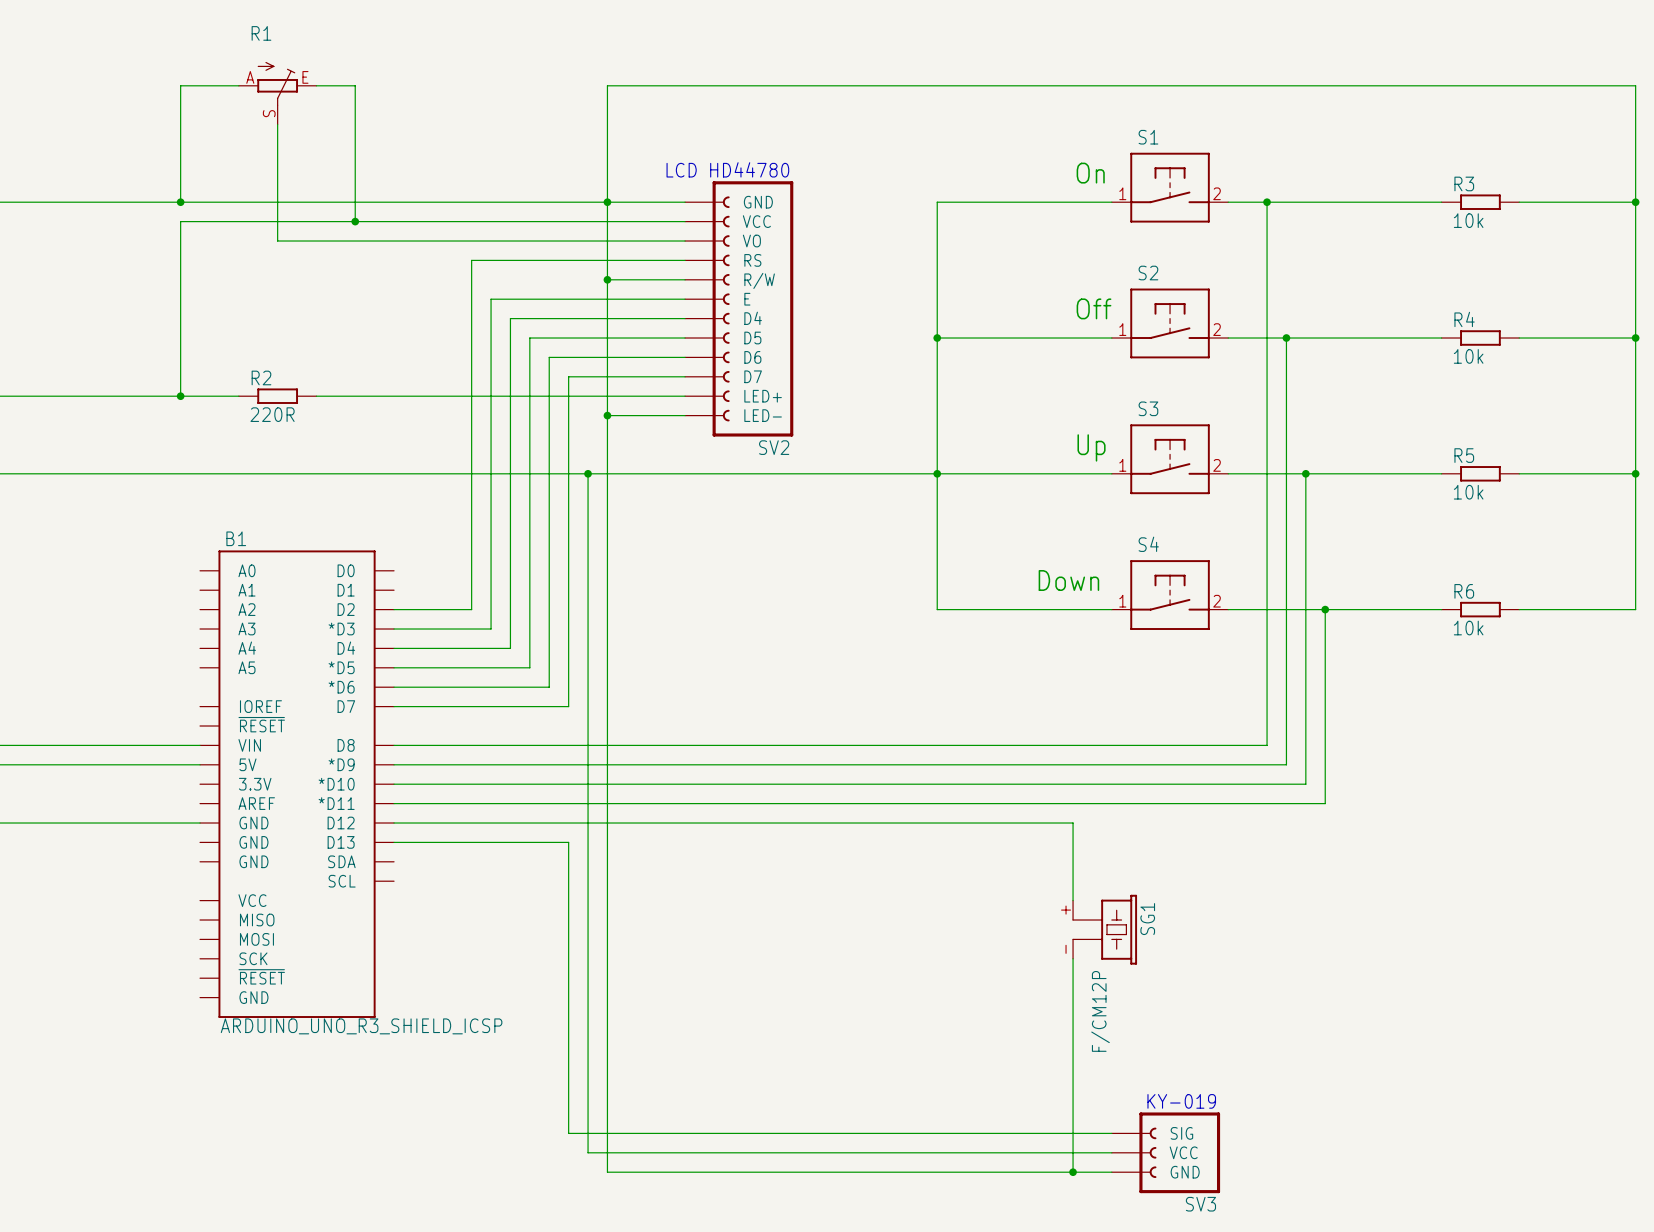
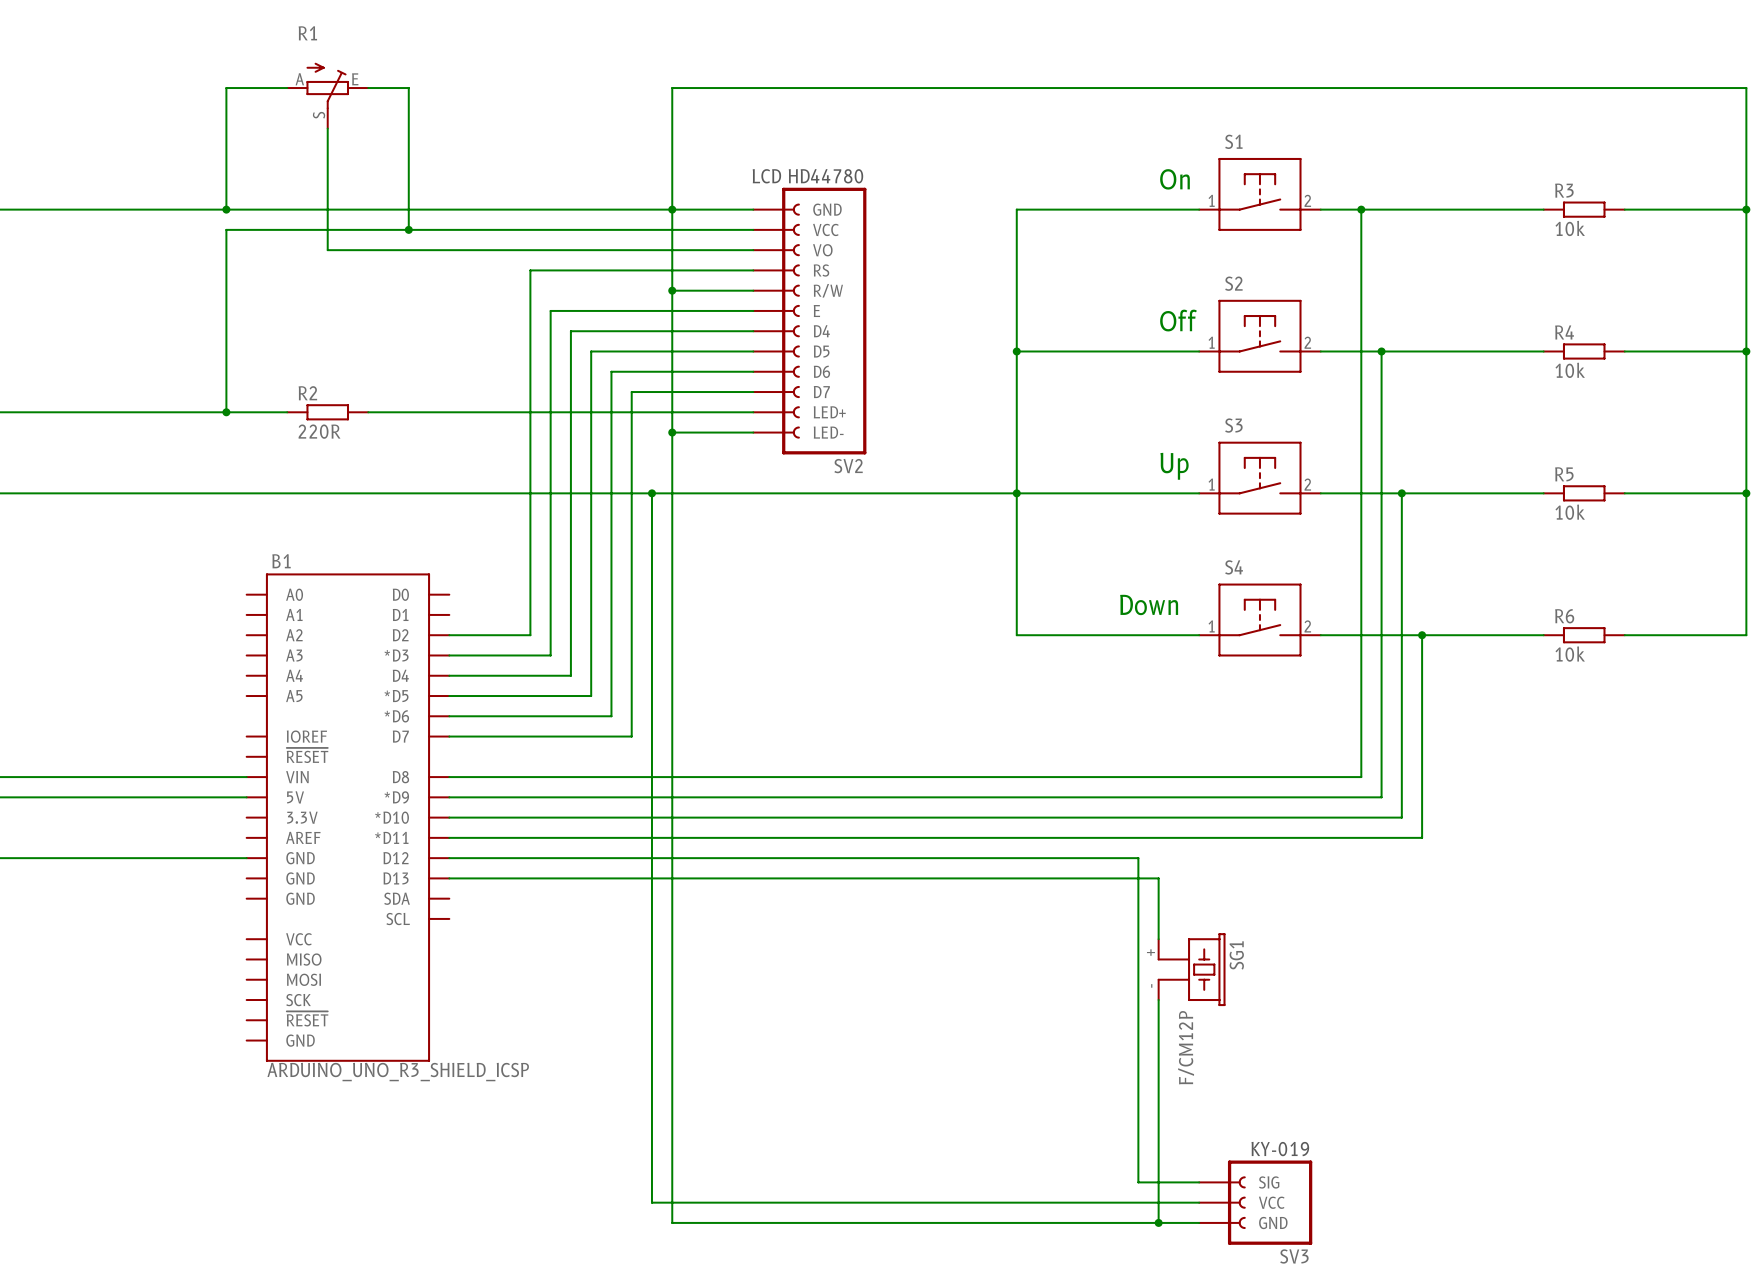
wire: (1053, 823) (1073, 823) (1073, 842) -> (1138, 858) (1138, 1182)
wire: (568, 842) (568, 1133) (1053, 1133) -> (631, 878) (1158, 878)

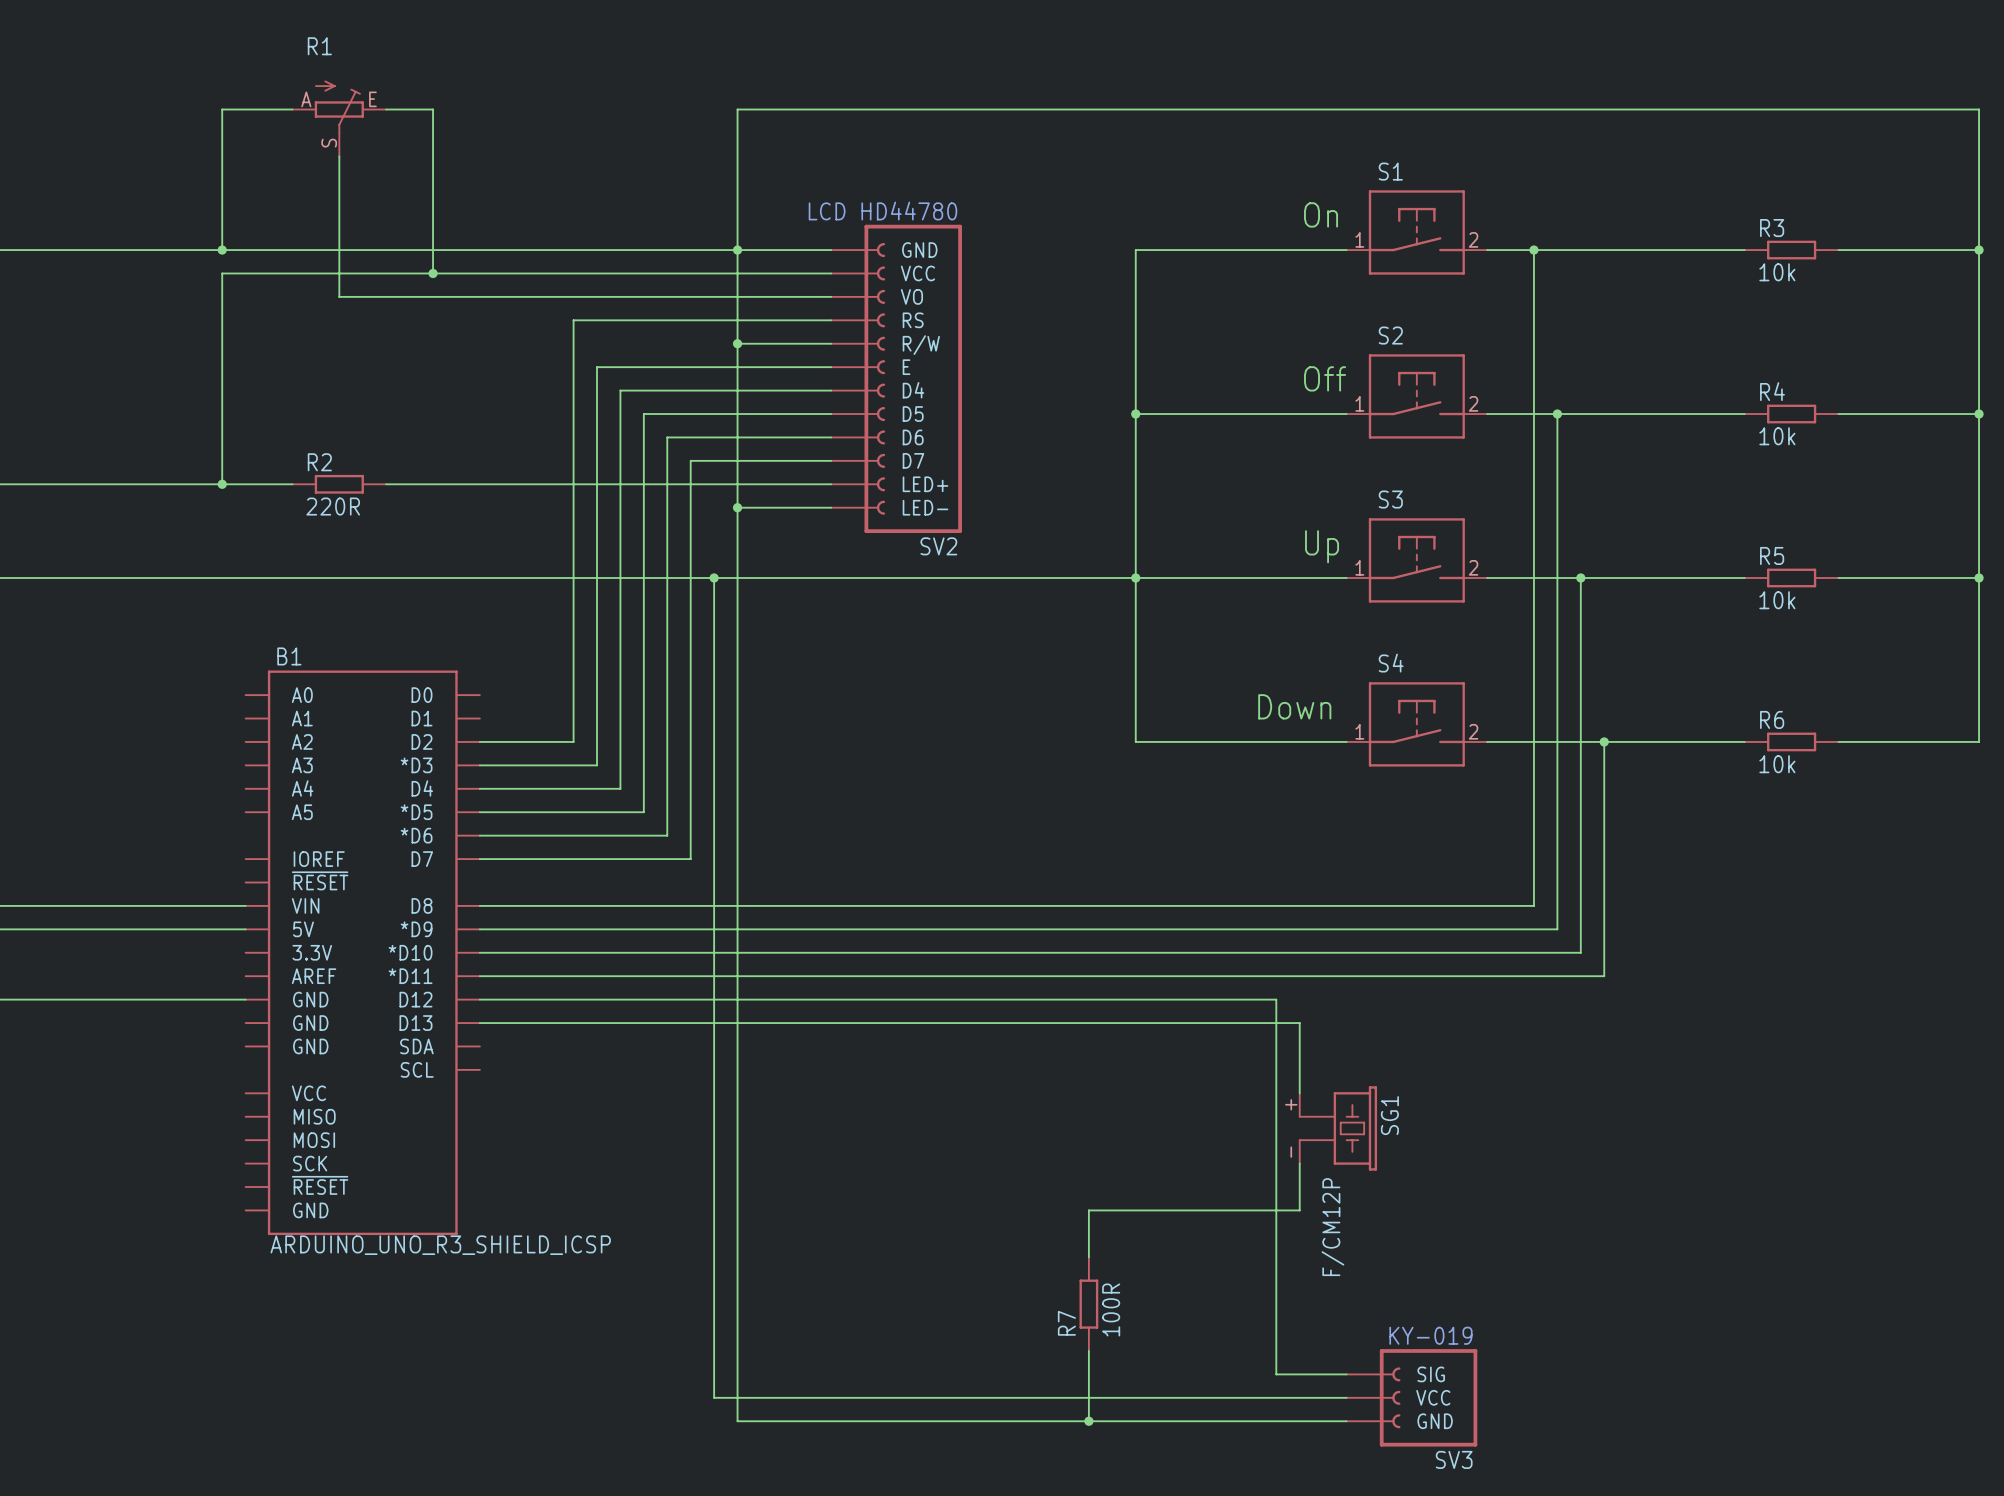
wire: (1158, 1040) (1158, 1222) -> (1299, 1210) (1088, 1210) (1088, 1257)
R7: none -> 100R (1088, 1304)
wire: none -> (1088, 1350) (1088, 1421)
junction: none -> (1088, 1421)
junction: (1158, 1222) -> none

